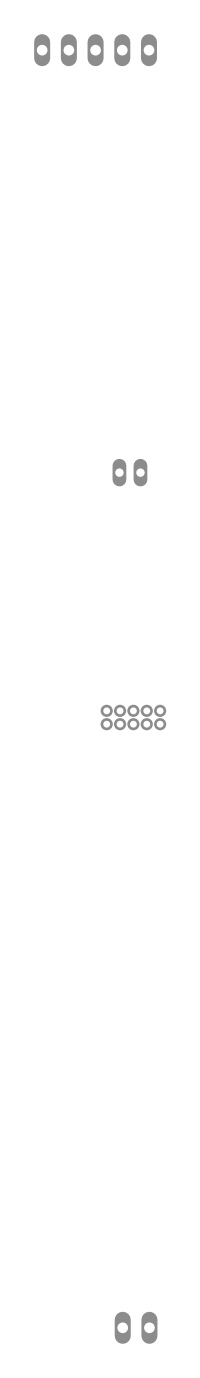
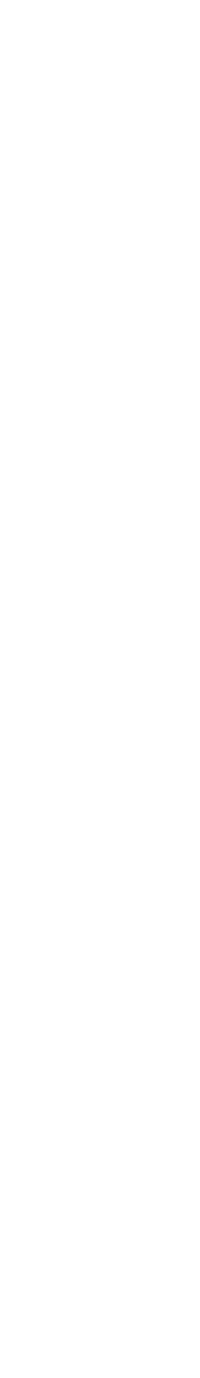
part: (95, 50) -> none
part: (129, 472) -> none
part: (133, 717) -> none
part: (136, 1327) -> none

